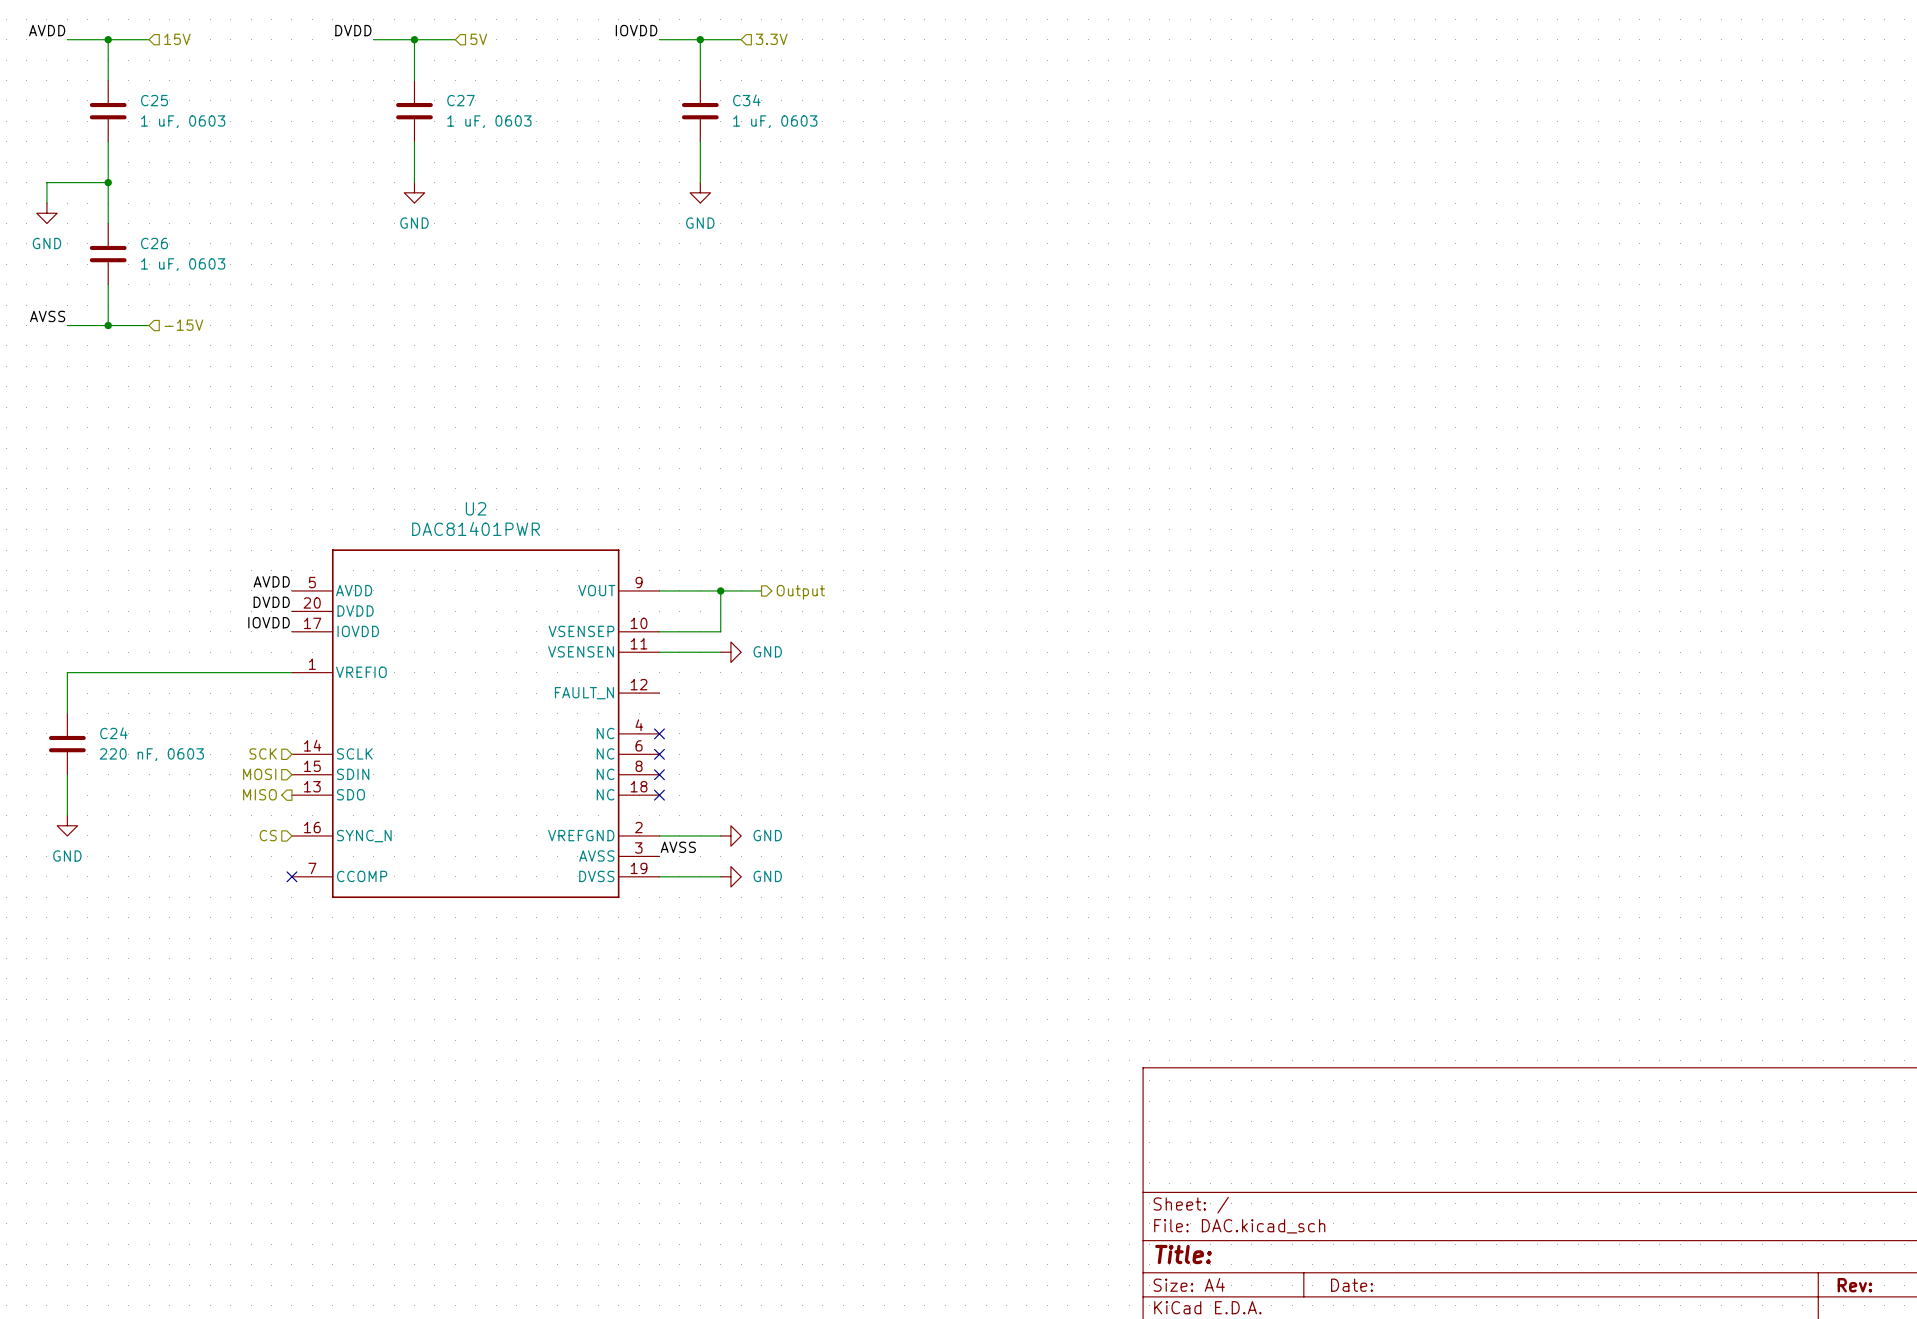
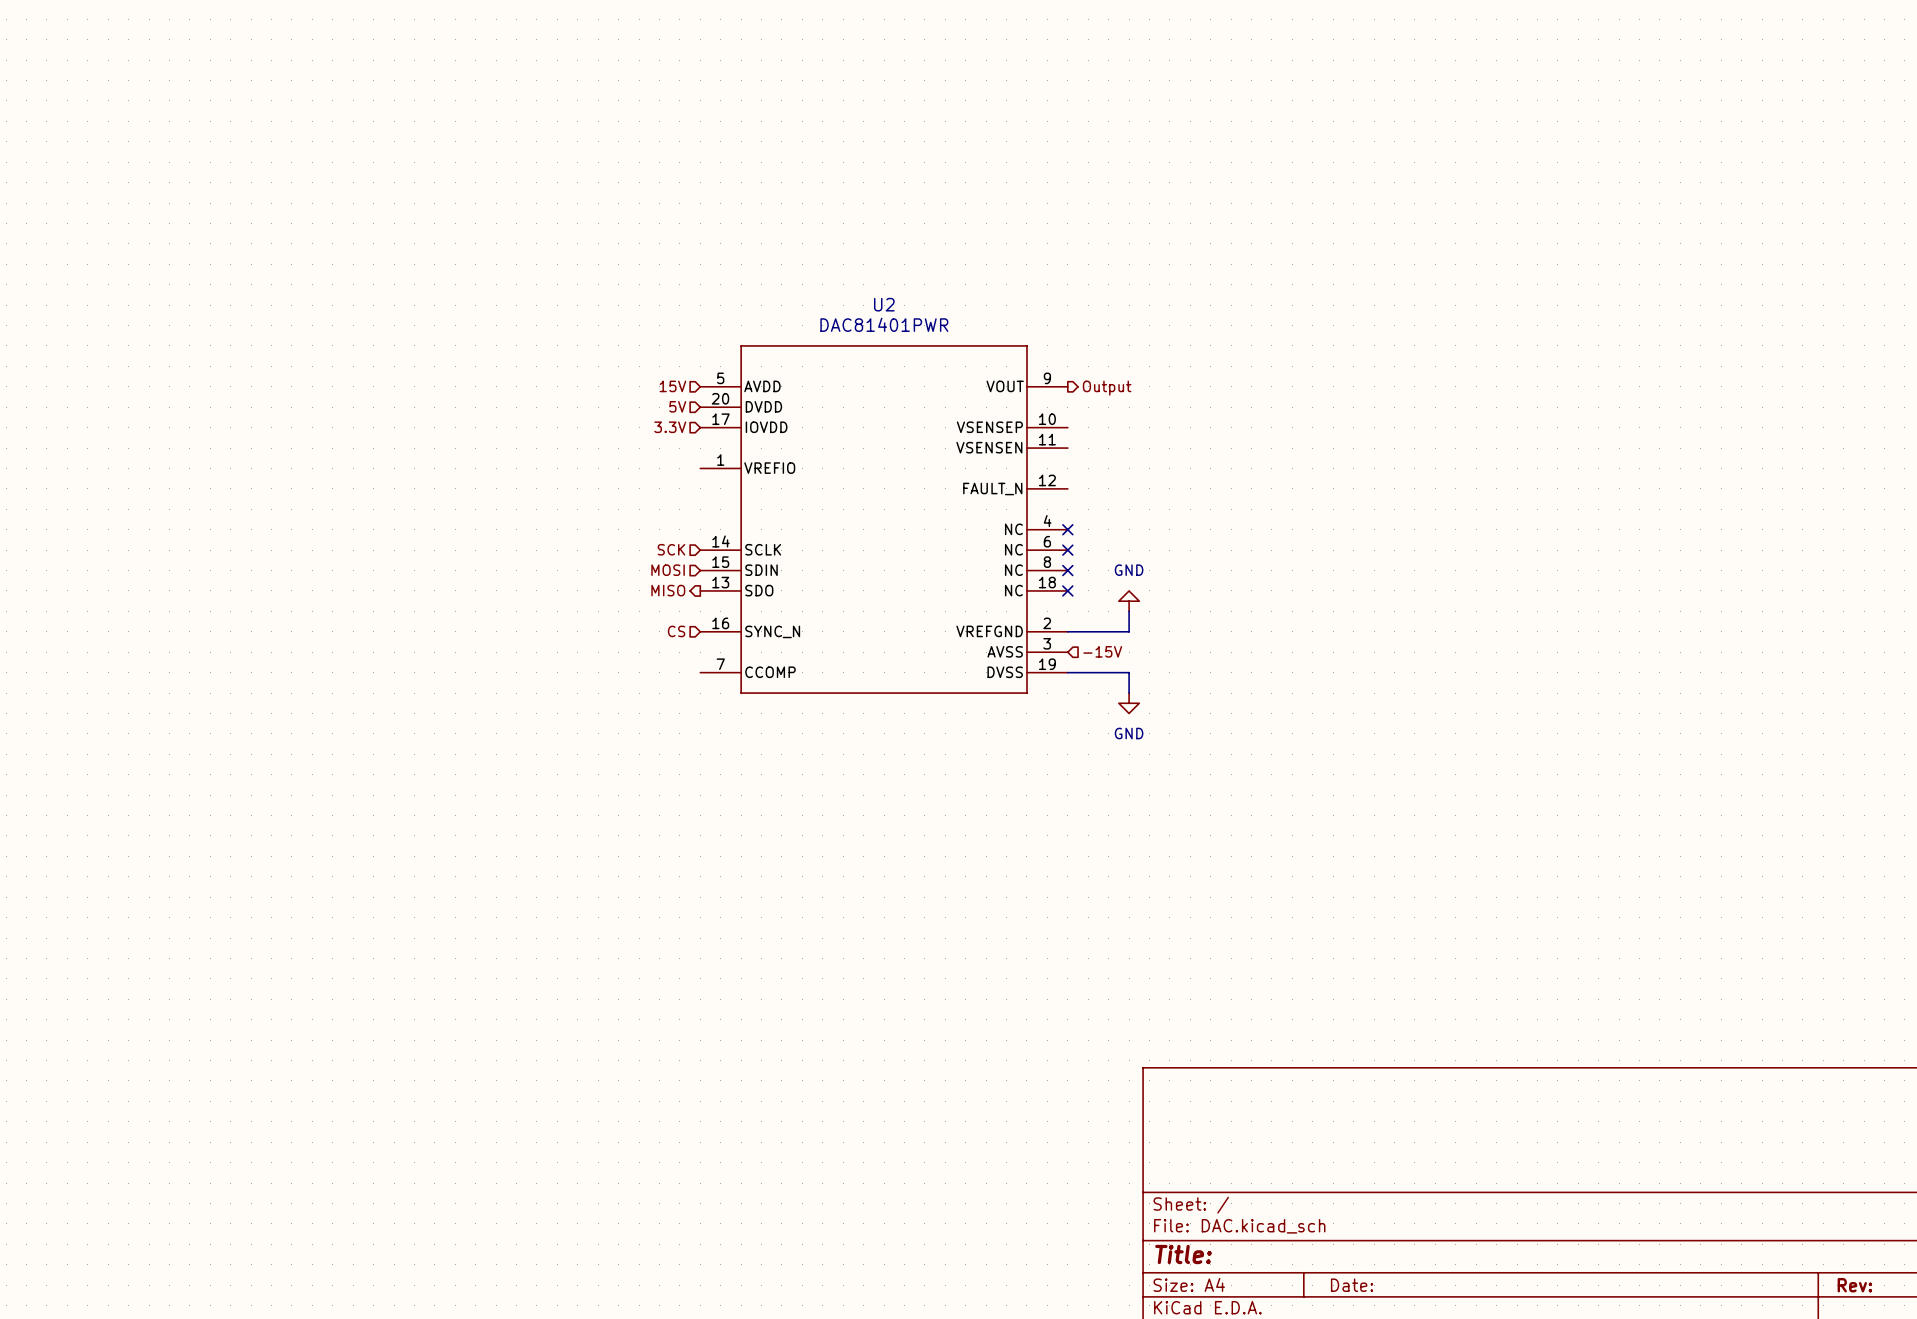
label: AVDD (47, 30) -> none
label: DVDD (353, 30) -> none
label: IOVDD (636, 30) -> none
wire: (67, 39) (149, 39) -> none
wire: (108, 39) (108, 80) -> none
junction: (108, 39) -> none
hierarchical label: 15V (177, 39) -> none
wire: (373, 39) (455, 39) -> none
wire: (414, 39) (414, 80) -> none
junction: (414, 39) -> none
hierarchical label: 5V (478, 39) -> none
wire: (659, 39) (741, 39) -> none
wire: (700, 39) (700, 80) -> none
junction: (700, 39) -> none
hierarchical label: 3.3V (771, 39) -> none
C25: 1 uF, 0603 (108, 111) -> none
C27: 1 uF, 0603 (414, 111) -> none
C34: 1 uF, 0603 (700, 111) -> none
wire: (108, 141) (108, 223) -> none
wire: (414, 141) (414, 182) -> none
wire: (700, 141) (700, 182) -> none
wire: (108, 182) (46, 182) (46, 203) -> none
junction: (108, 182) -> none
power symbol: GND (414, 192) -> none
power symbol: GND (700, 192) -> none
power symbol: GND (46, 213) -> none
C26: 1 uF, 0603 (108, 254) -> none
wire: (108, 284) (108, 325) -> none
label: AVSS (47, 316) -> none
wire: (67, 325) (149, 325) -> none
junction: (108, 325) -> none
hierarchical label: -15V (183, 325) -> none
hierarchical label: none -> 15V (672, 386)
hierarchical label: none -> Output (1107, 388)
hierarchical label: none -> 5V (677, 406)
hierarchical label: none -> 3.3V (670, 427)
no-connect mark: none -> (1067, 529)
hierarchical label: none -> SCK (671, 549)
no-connect mark: none -> (1067, 550)
hierarchical label: none -> MOSI (668, 570)
no-connect mark: none -> (1067, 570)
label: AVDD (271, 581) -> none
hierarchical label: none -> MISO (668, 590)
wire: (720, 590) (720, 631) (659, 631) -> none
junction: (720, 590) -> none
no-connect mark: none -> (1067, 590)
hierarchical label: Output (800, 592) -> none
power symbol: none -> GND (1129, 601)
label: DVDD (271, 602) -> none
wire: none -> (1129, 611) (1129, 631) (1067, 631)
label: IOVDD (269, 622) -> none
hierarchical label: none -> CS (676, 631)
hierarchical label: none -> -15V (1102, 651)
wire: (659, 652) (720, 652) -> none
power symbol: GND (730, 652) -> none
wire: (291, 672) (67, 672) (67, 713) -> none
wire: none -> (1067, 672) (1129, 672) (1129, 693)
power symbol: none -> GND (1129, 703)
U2 position: (475, 723) -> (884, 519)
no-connect mark: (659, 733) -> none
C24: 220 nF, 0603 (67, 744) -> none
hierarchical label: SCK (263, 753) -> none
no-connect mark: (659, 754) -> none
wire: (67, 774) (67, 815) -> none
hierarchical label: MOSI (259, 774) -> none
no-connect mark: (659, 774) -> none
hierarchical label: MISO (259, 794) -> none
no-connect mark: (659, 795) -> none
power symbol: GND (67, 825) -> none
hierarchical label: CS (268, 835) -> none
wire: (659, 835) (720, 835) -> none
power symbol: GND (730, 835) -> none
label: AVSS (678, 847) -> none
no-connect mark: (291, 876) -> none
wire: (659, 876) (720, 876) -> none
power symbol: GND (730, 876) -> none

